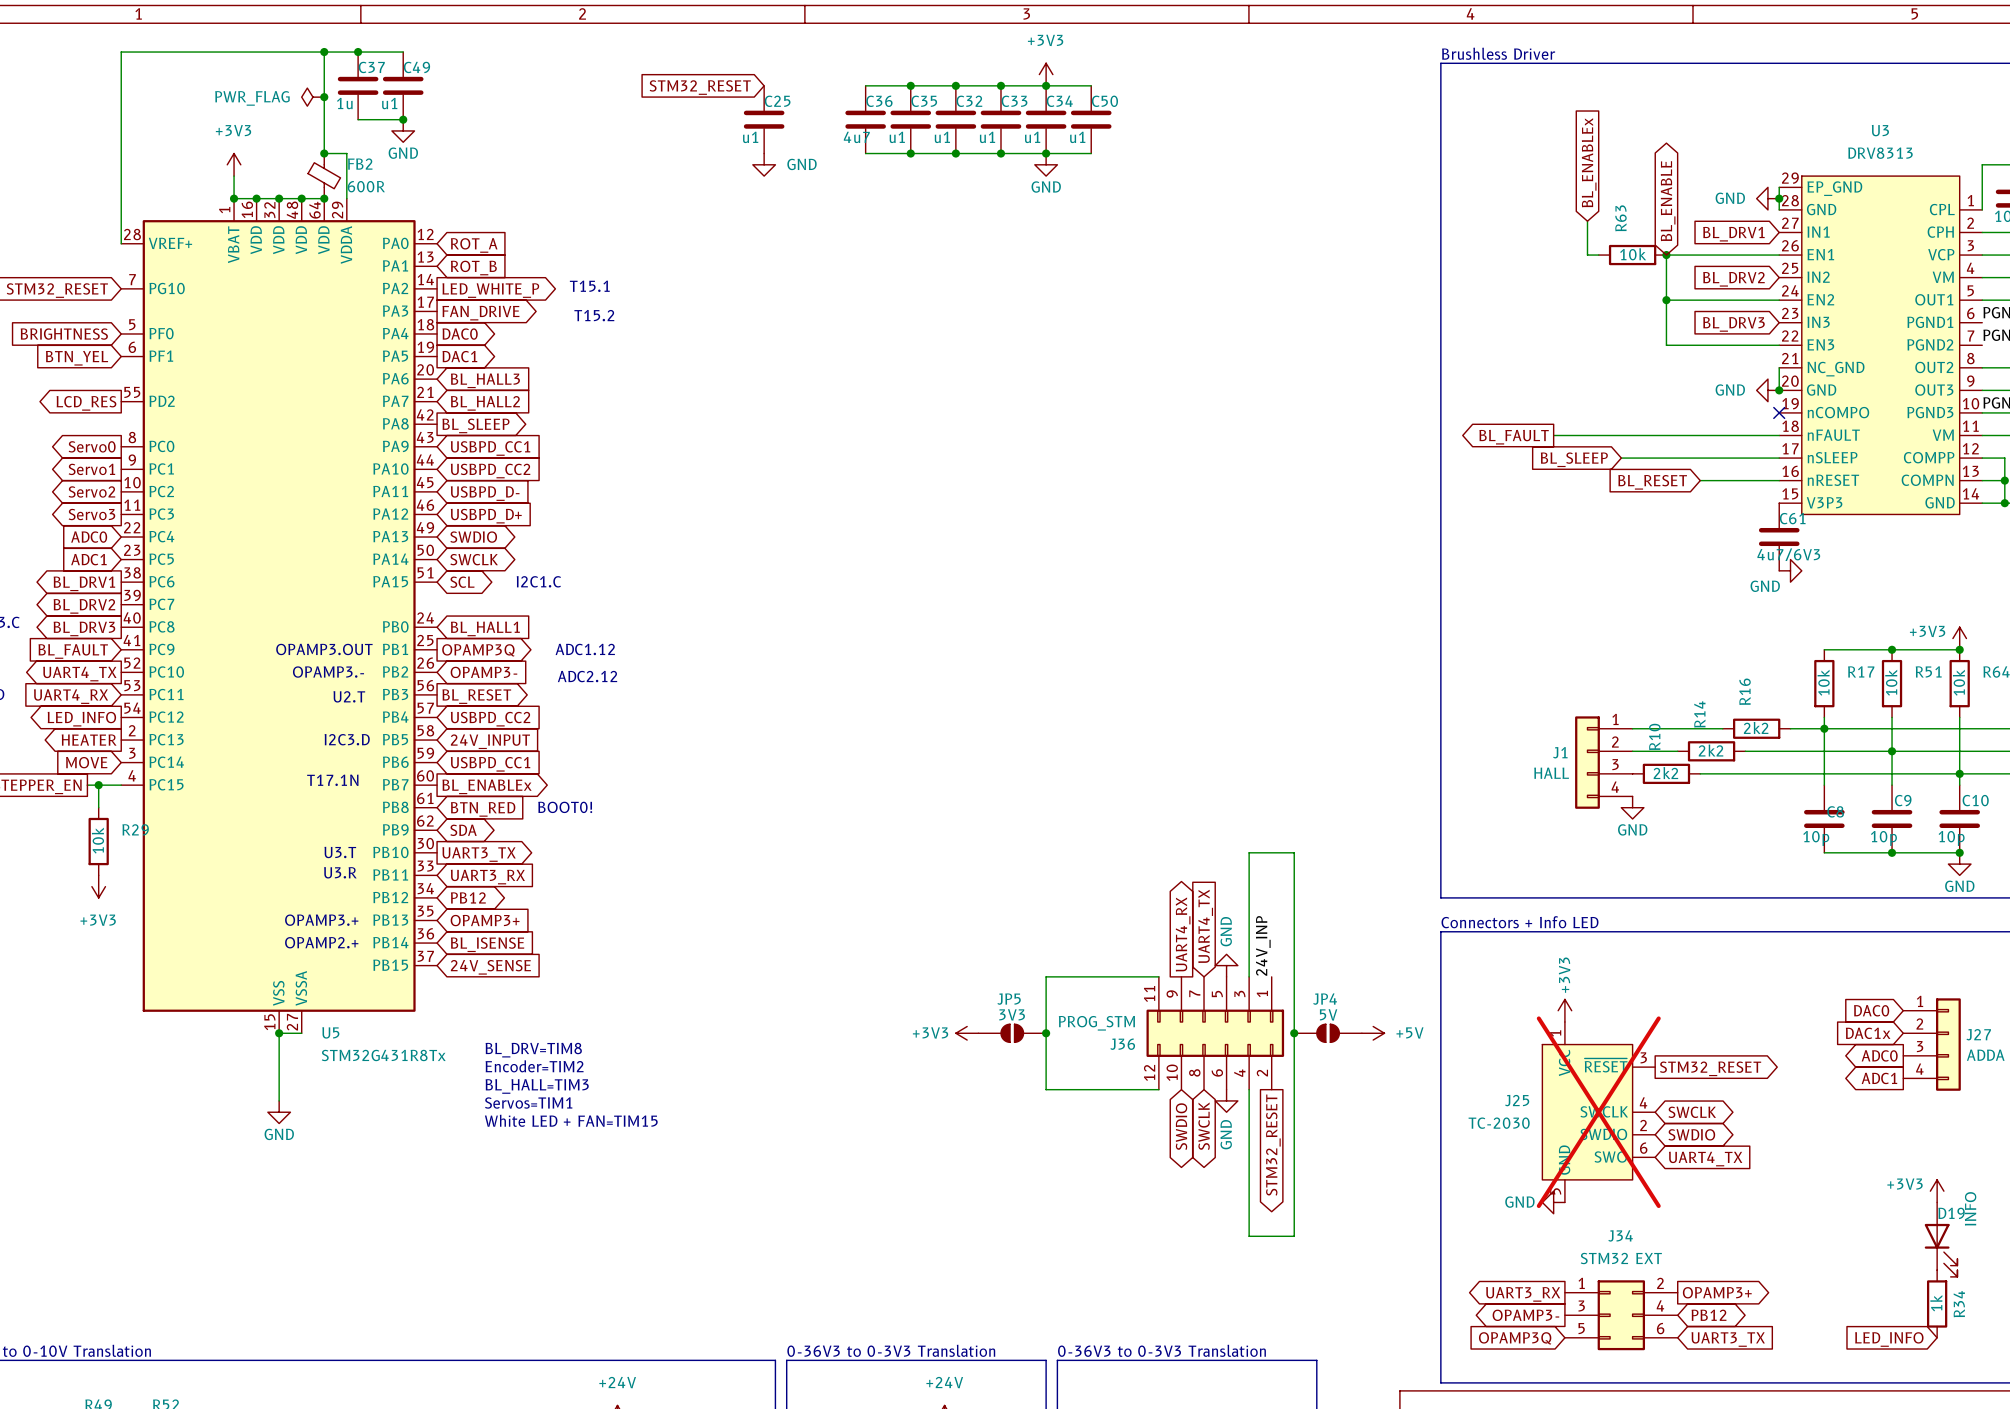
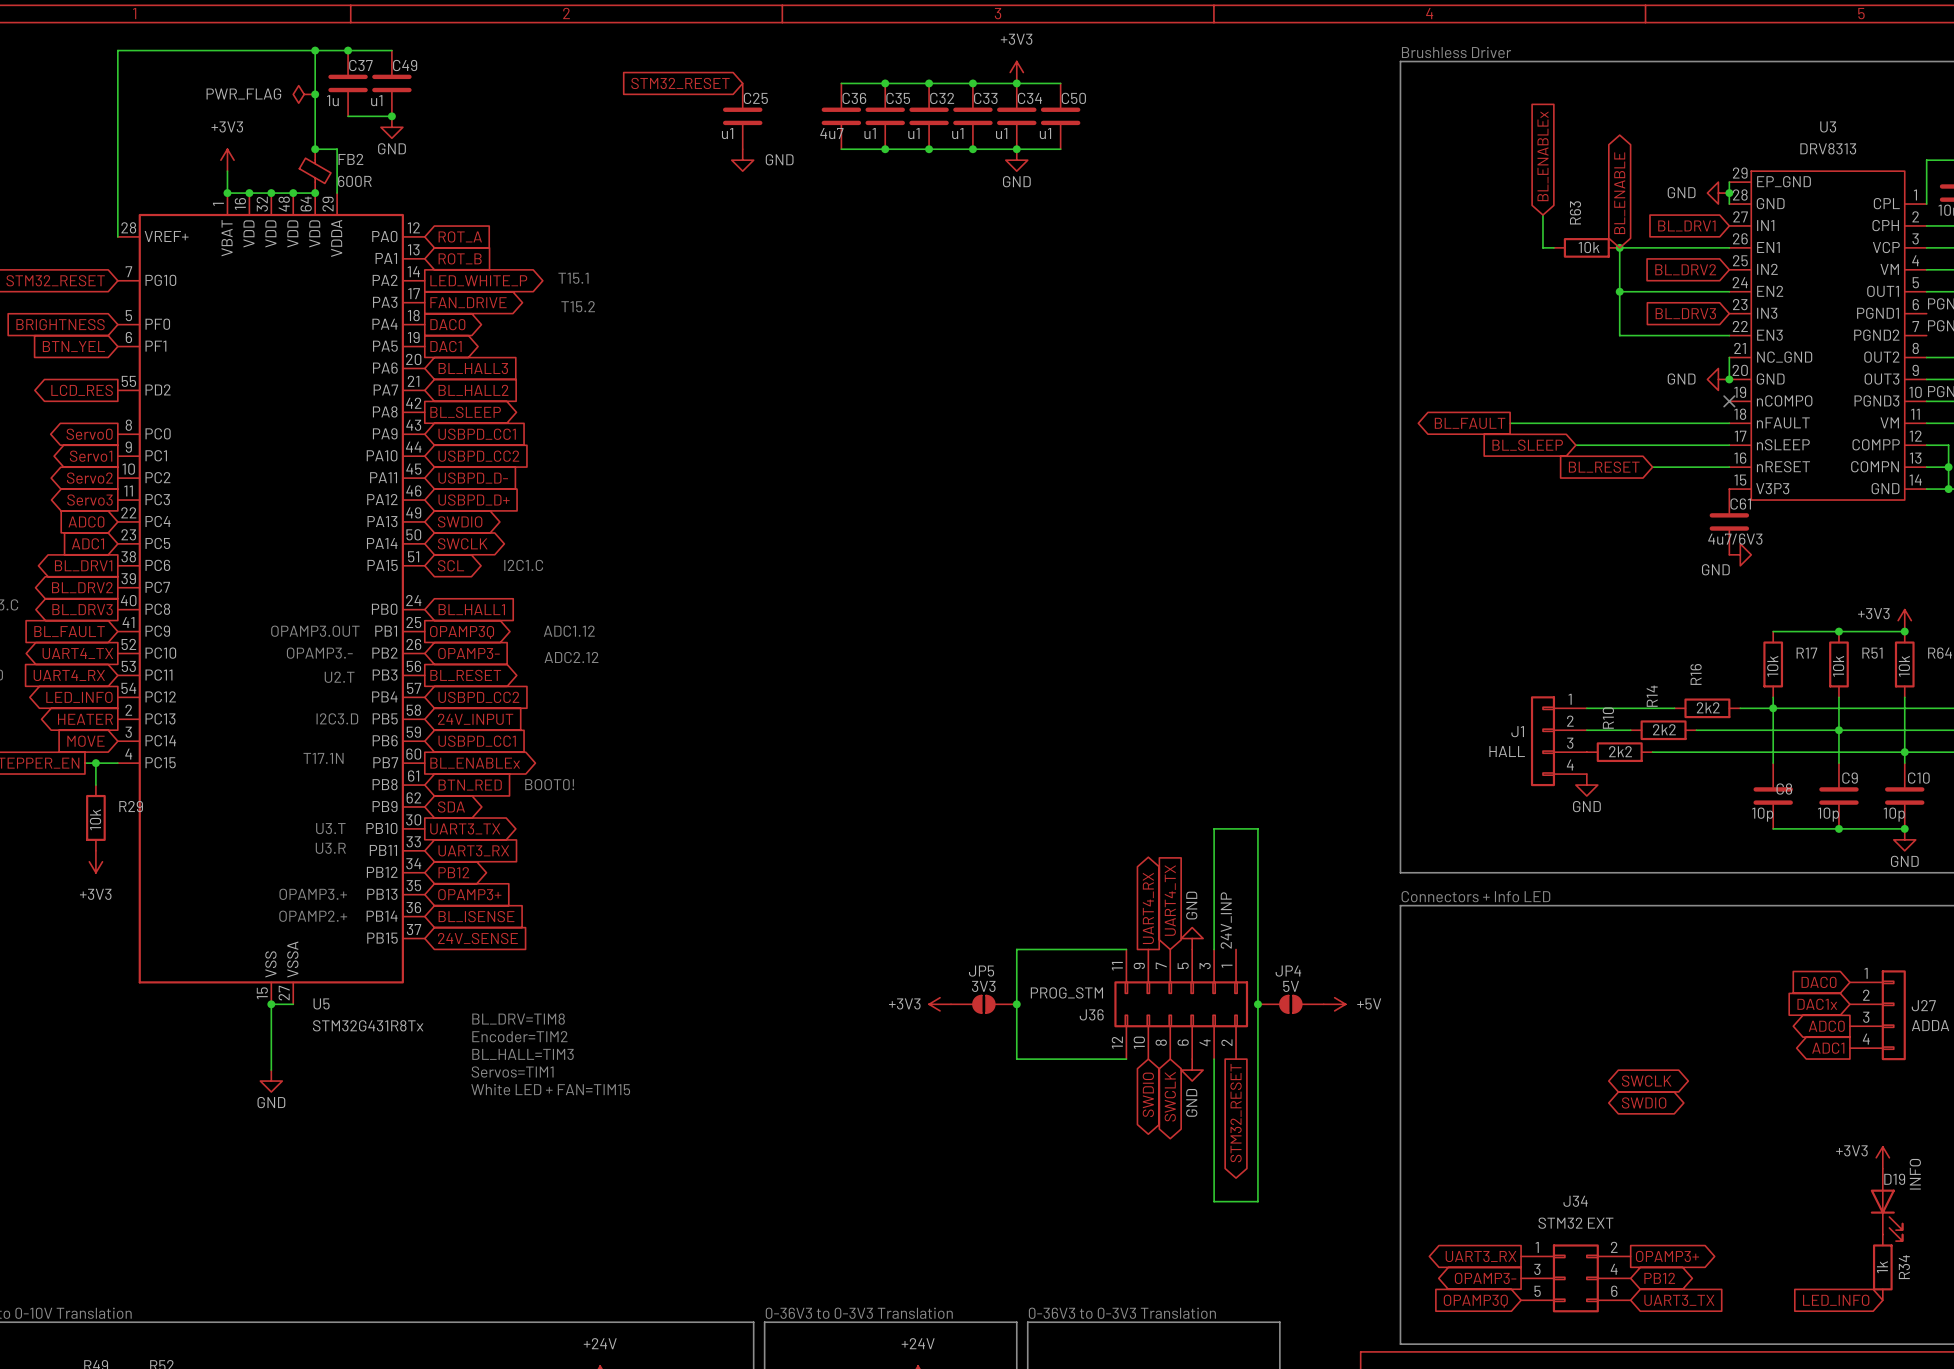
power symbol: +3V3 (1564, 1010) -> none
global label: STM32_RESET (1710, 1068) -> none
J25: TC-2030 (1598, 1112) -> none
global label: UART4_TX (1705, 1159) -> none
power symbol: GND (1553, 1202) -> none

